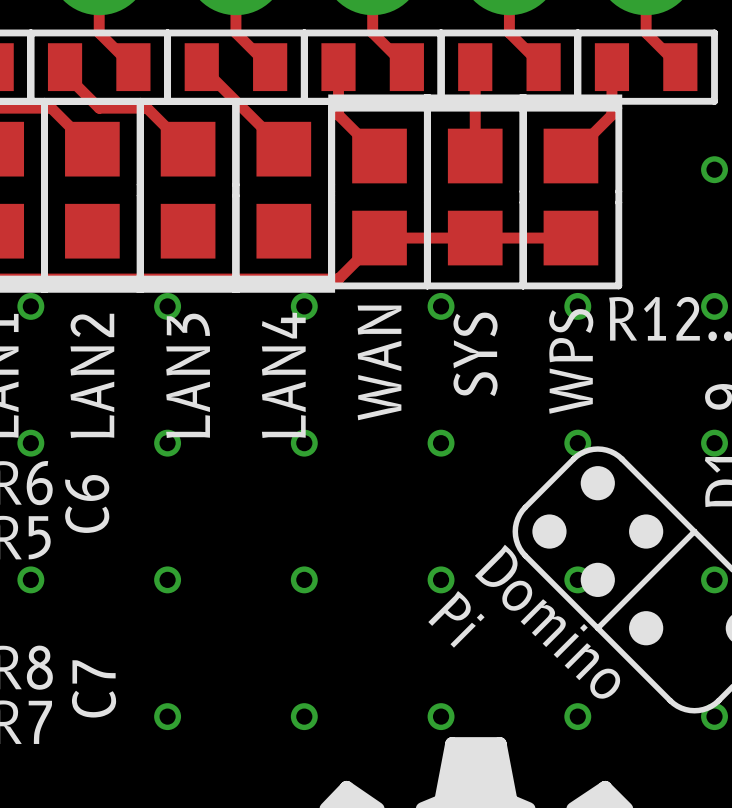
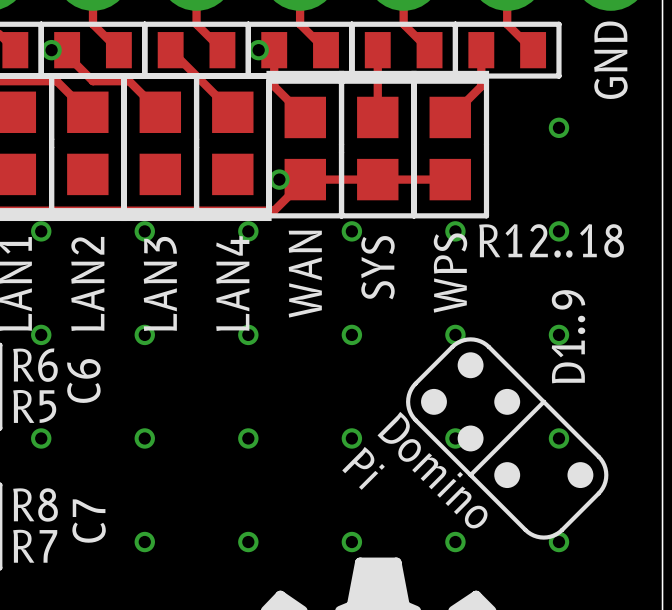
via: none -> (51, 50)
via: none -> (258, 50)
via: none -> (279, 179)

